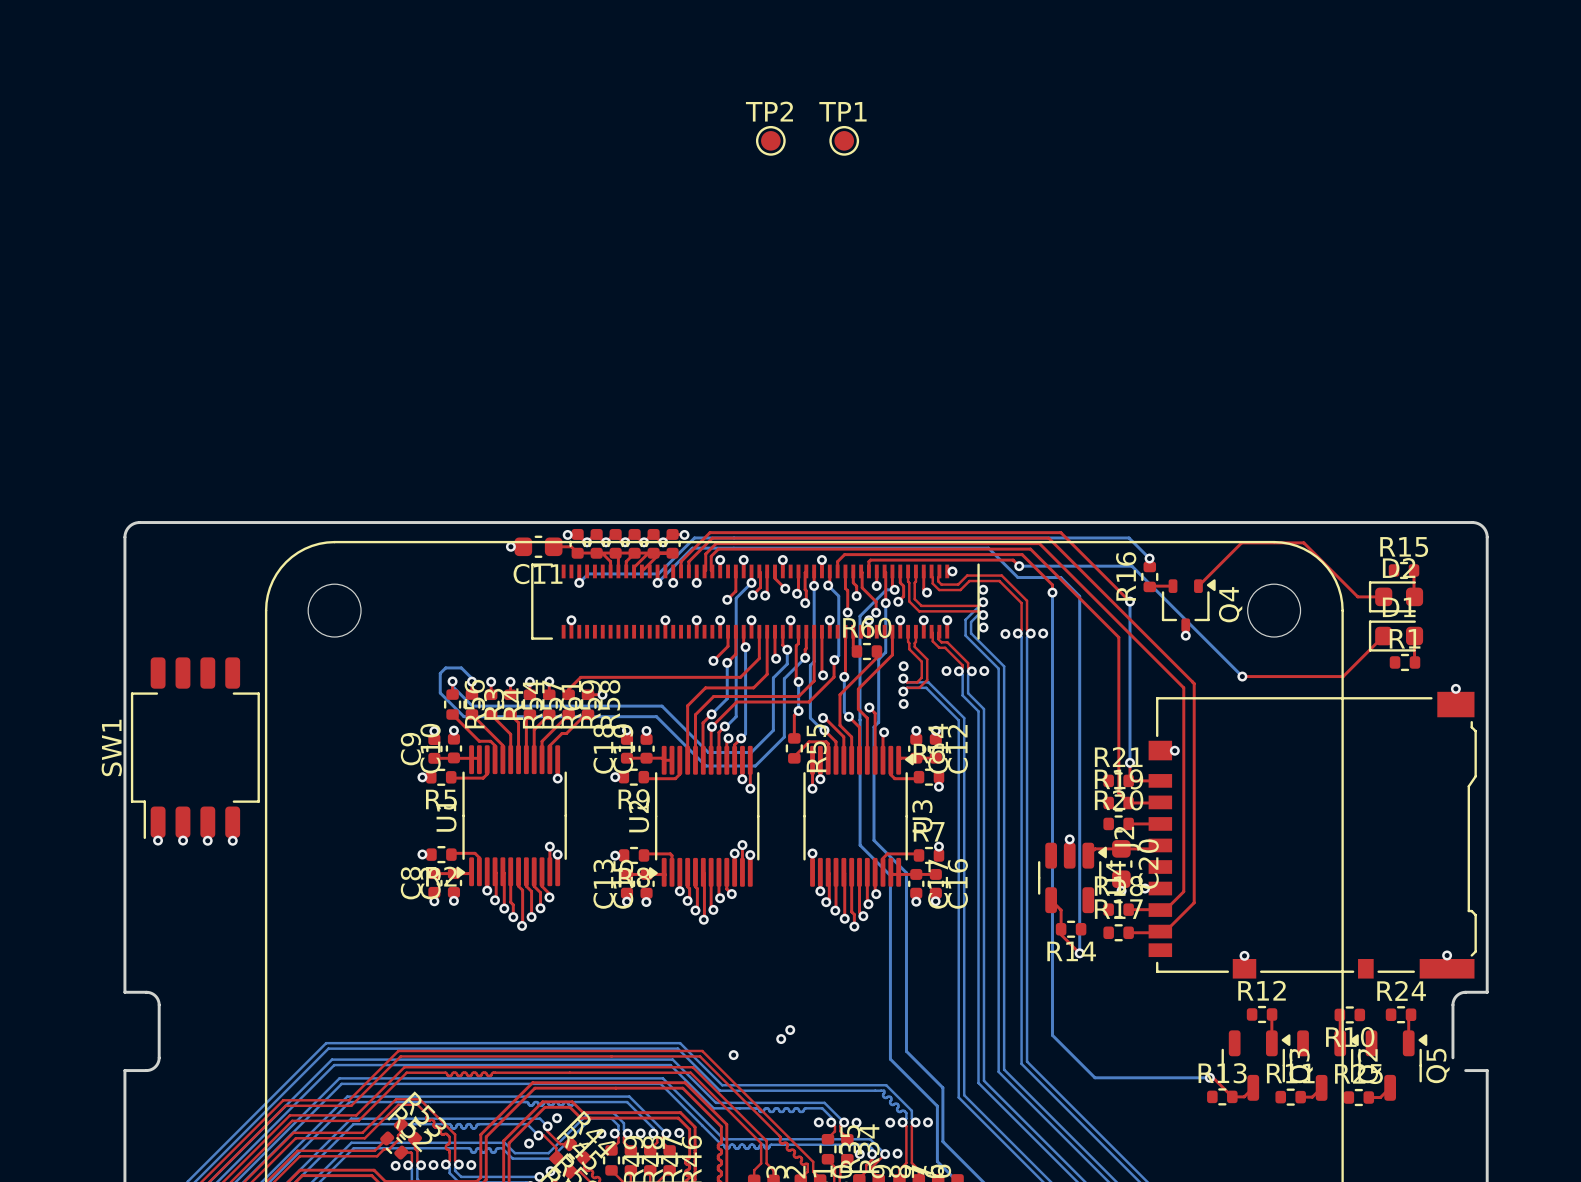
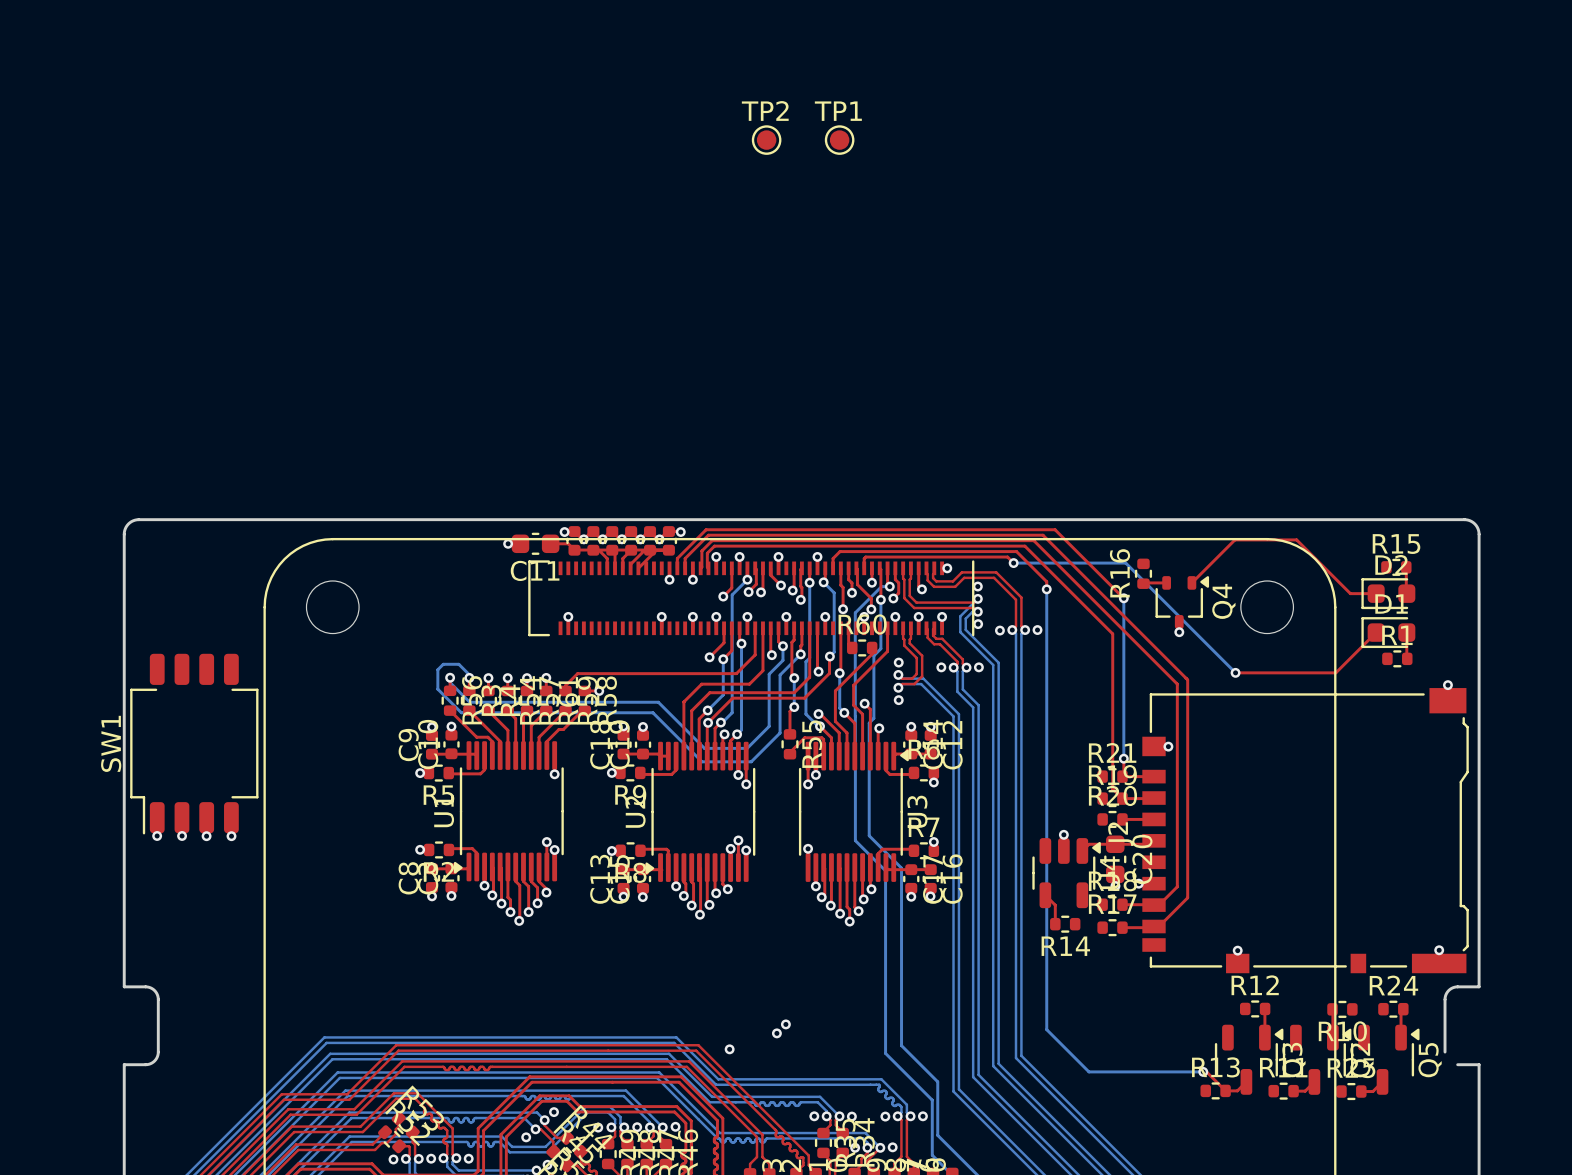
bottom track: (1149, 558) (1129, 537) (694, 537) (658, 573) (588, 573) (579, 582) -> none
via: (1149, 558) -> none
via: (579, 582) -> none
bottom track: (657, 582) (692, 548) (988, 548) (1017, 577) (1060, 577) (1079, 596) (1079, 953) -> none
via: (657, 582) -> none
top track: (1061, 929) (1061, 934) (1079, 953) -> none
via: (1079, 953) -> none

